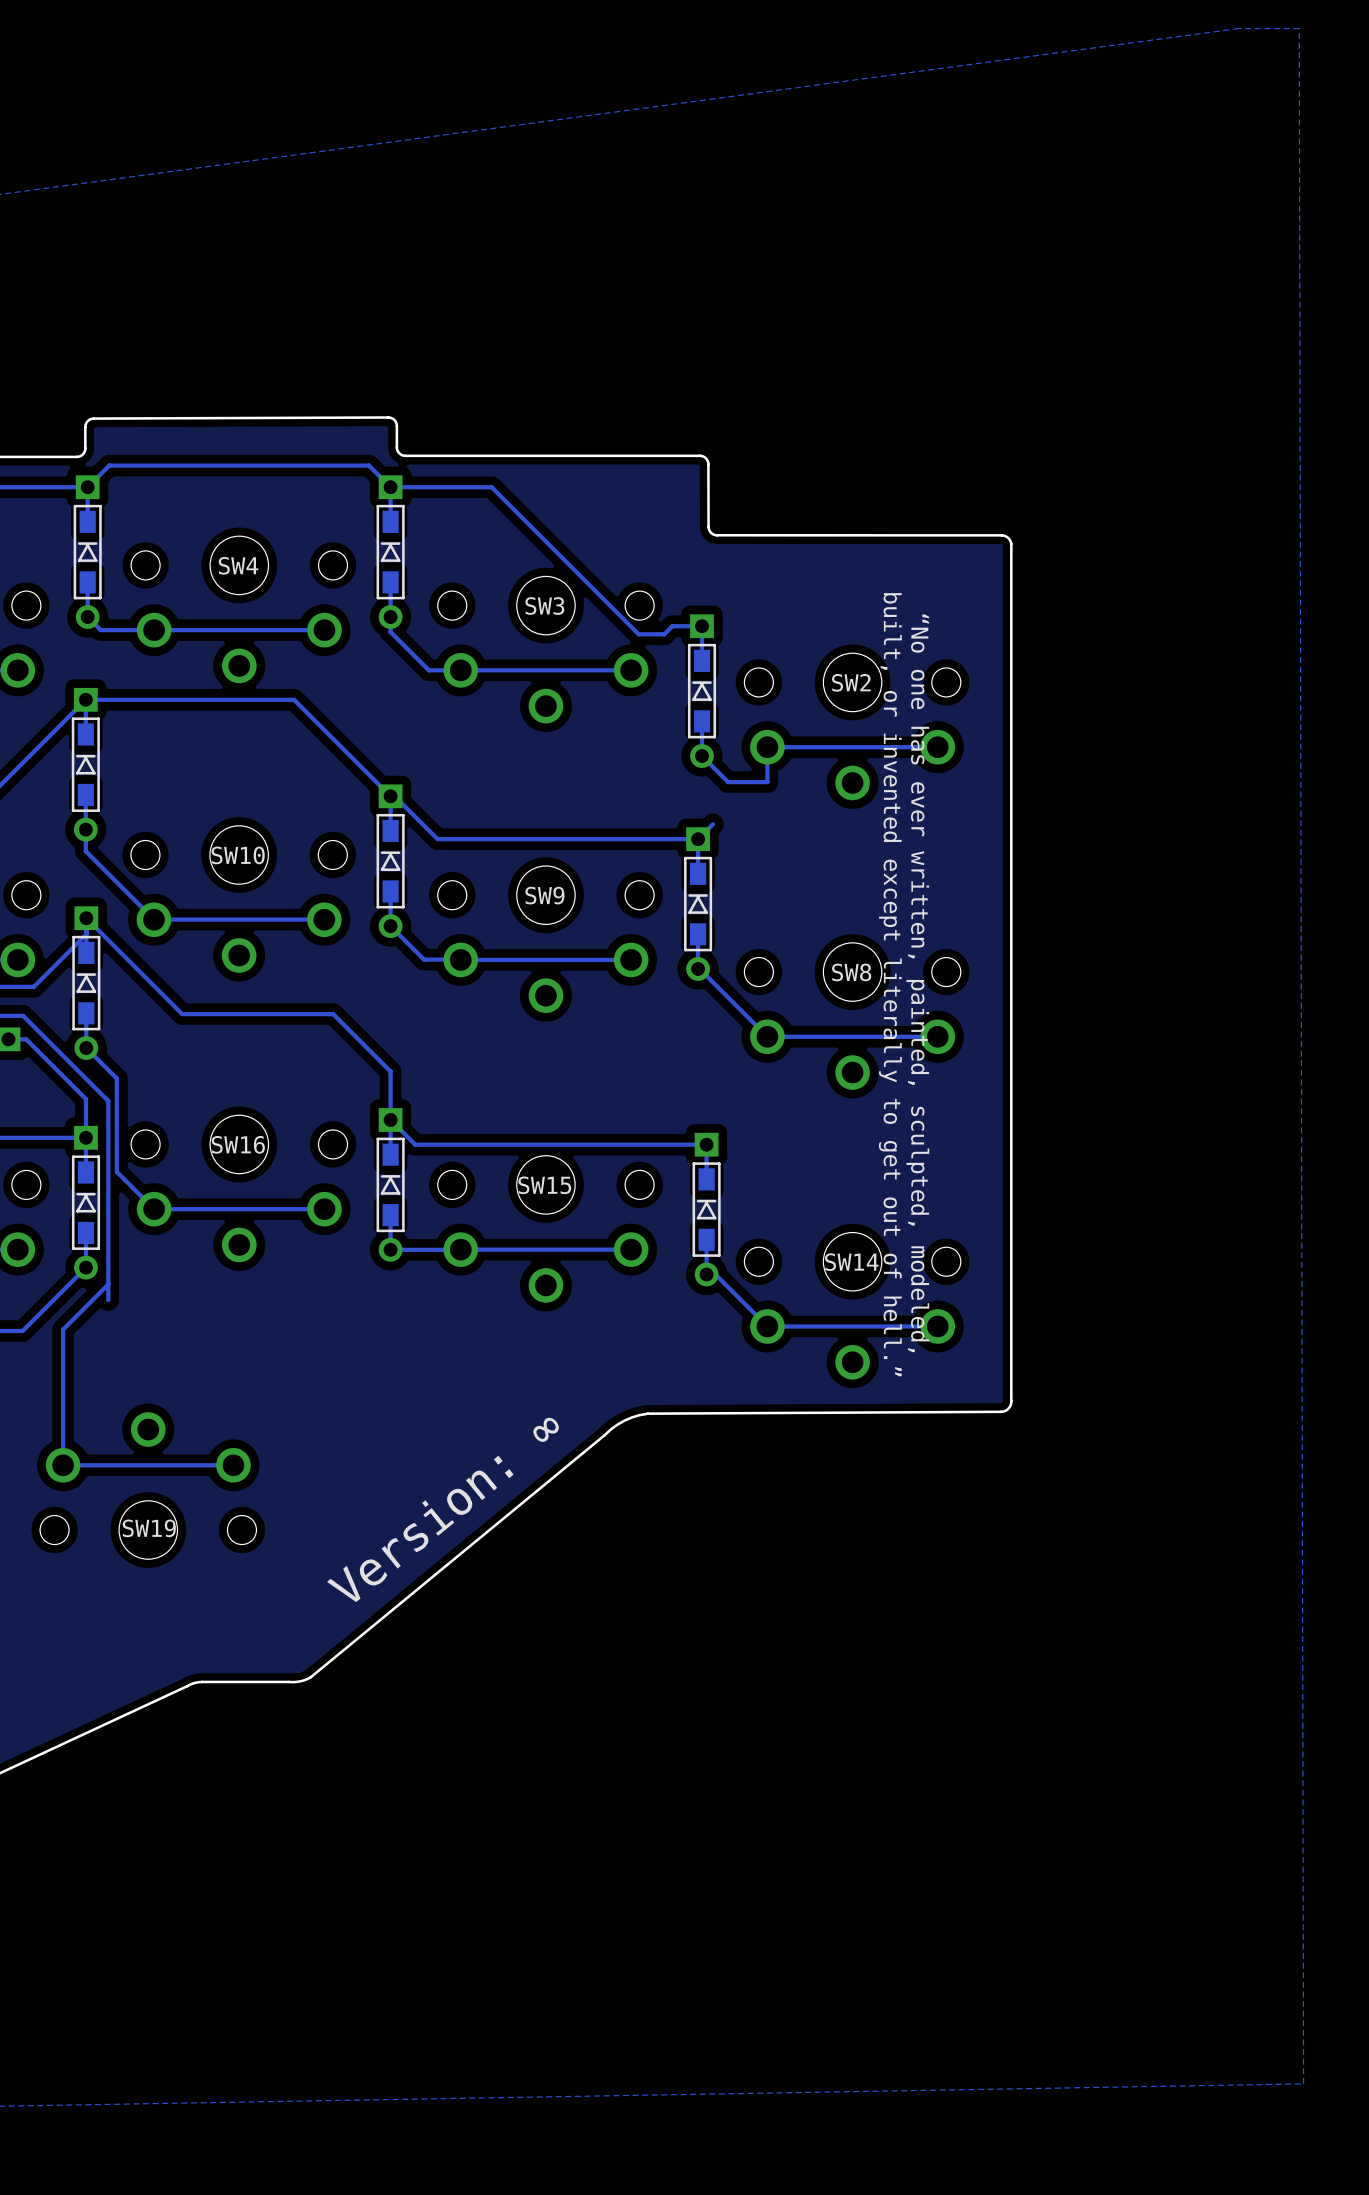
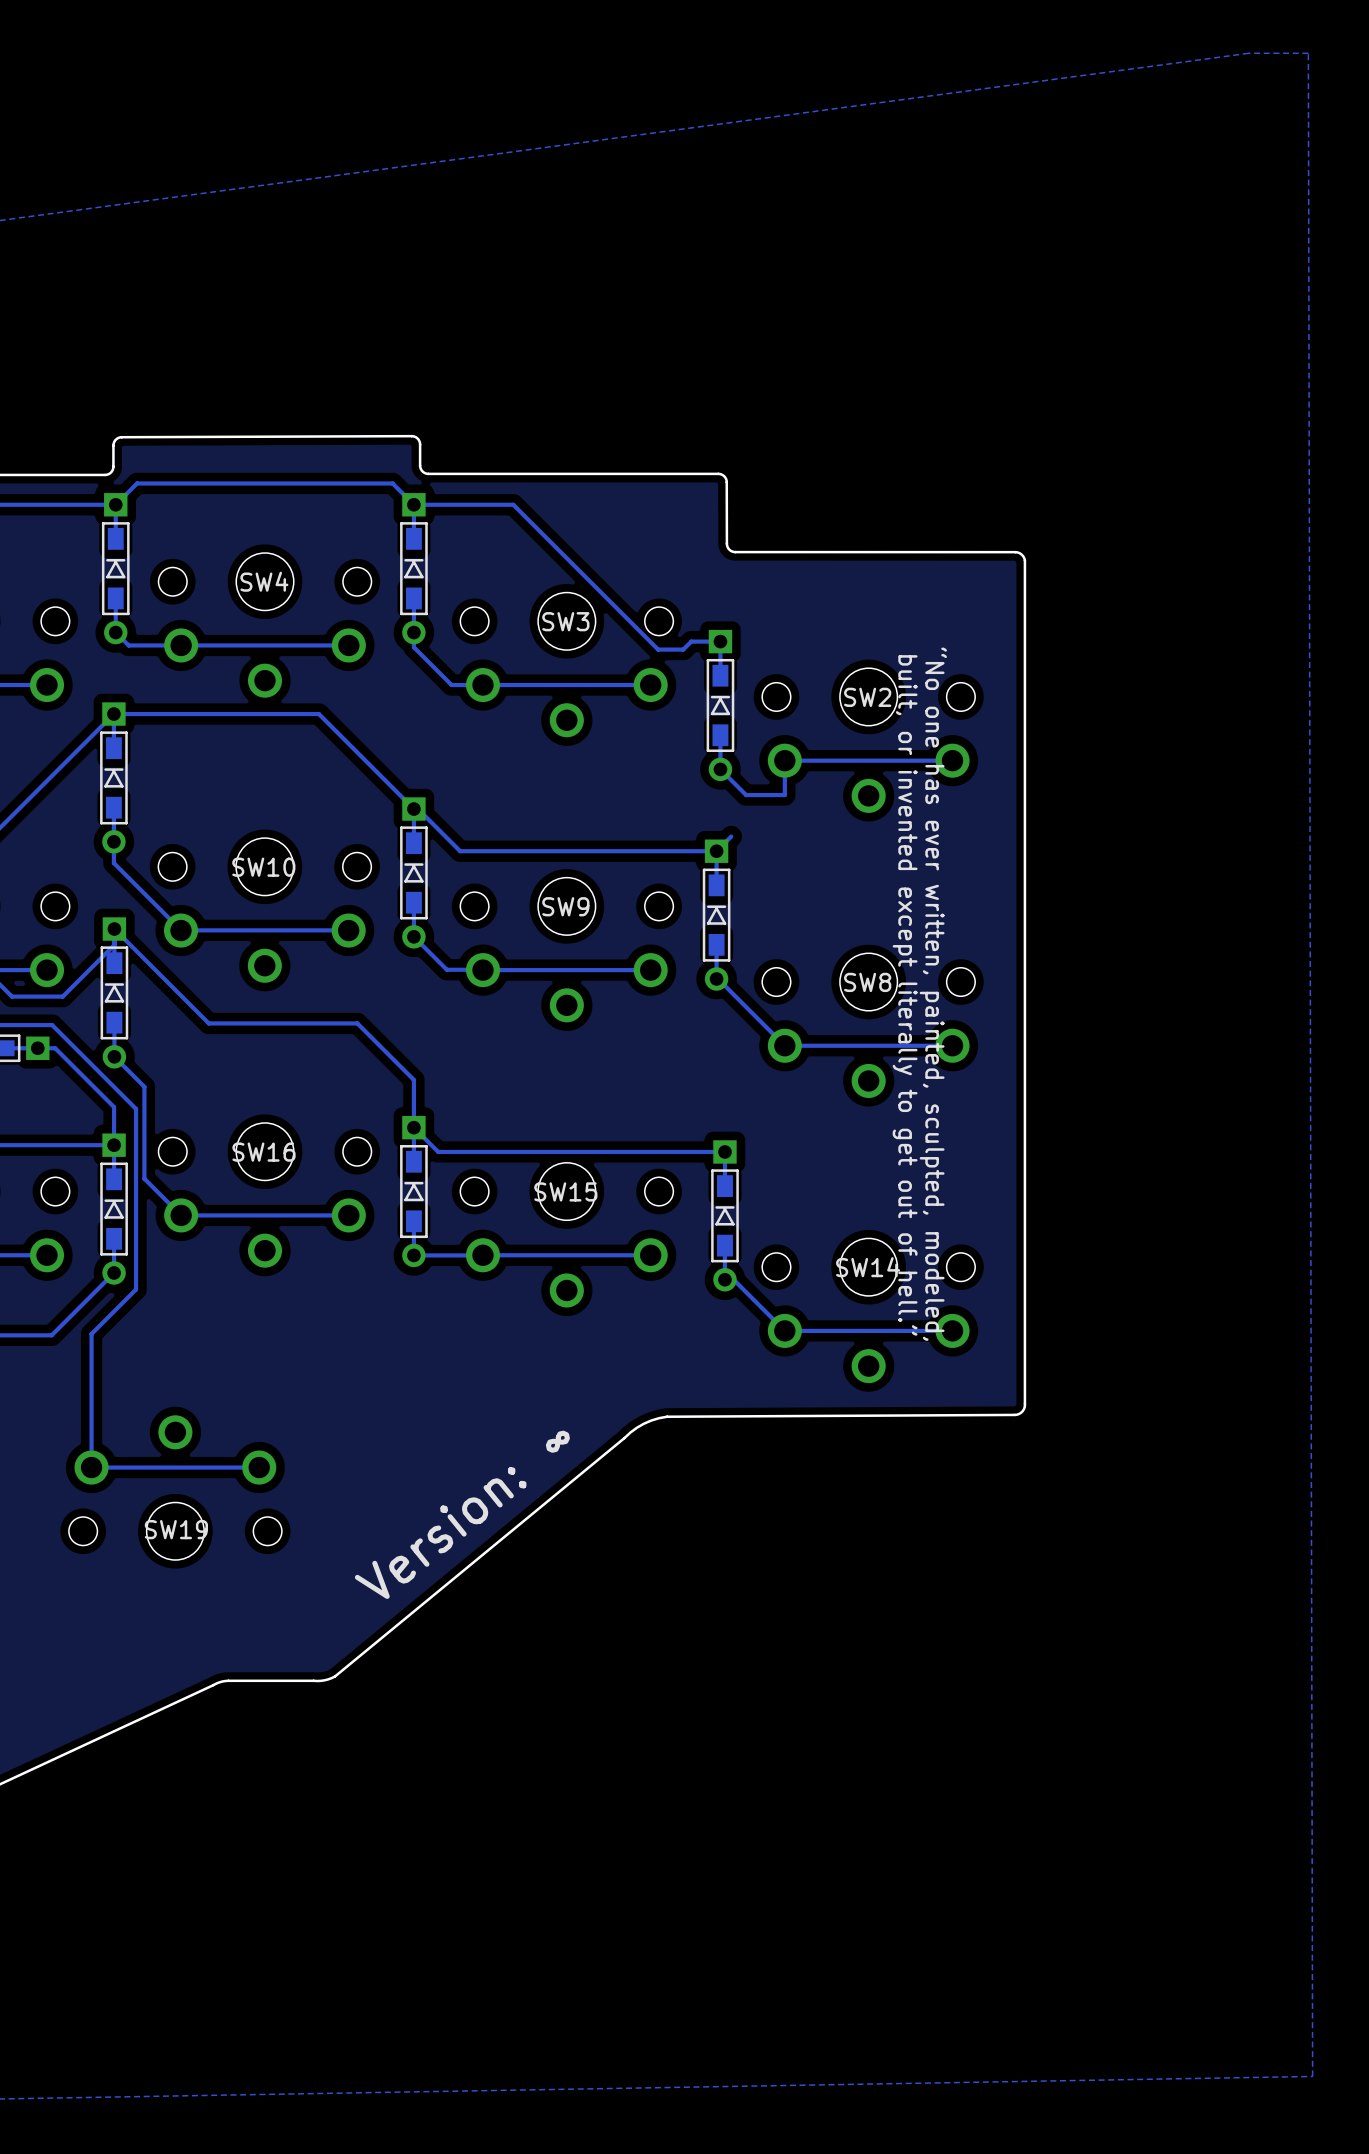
track: (108, 1284) (108, 1299) -> none

